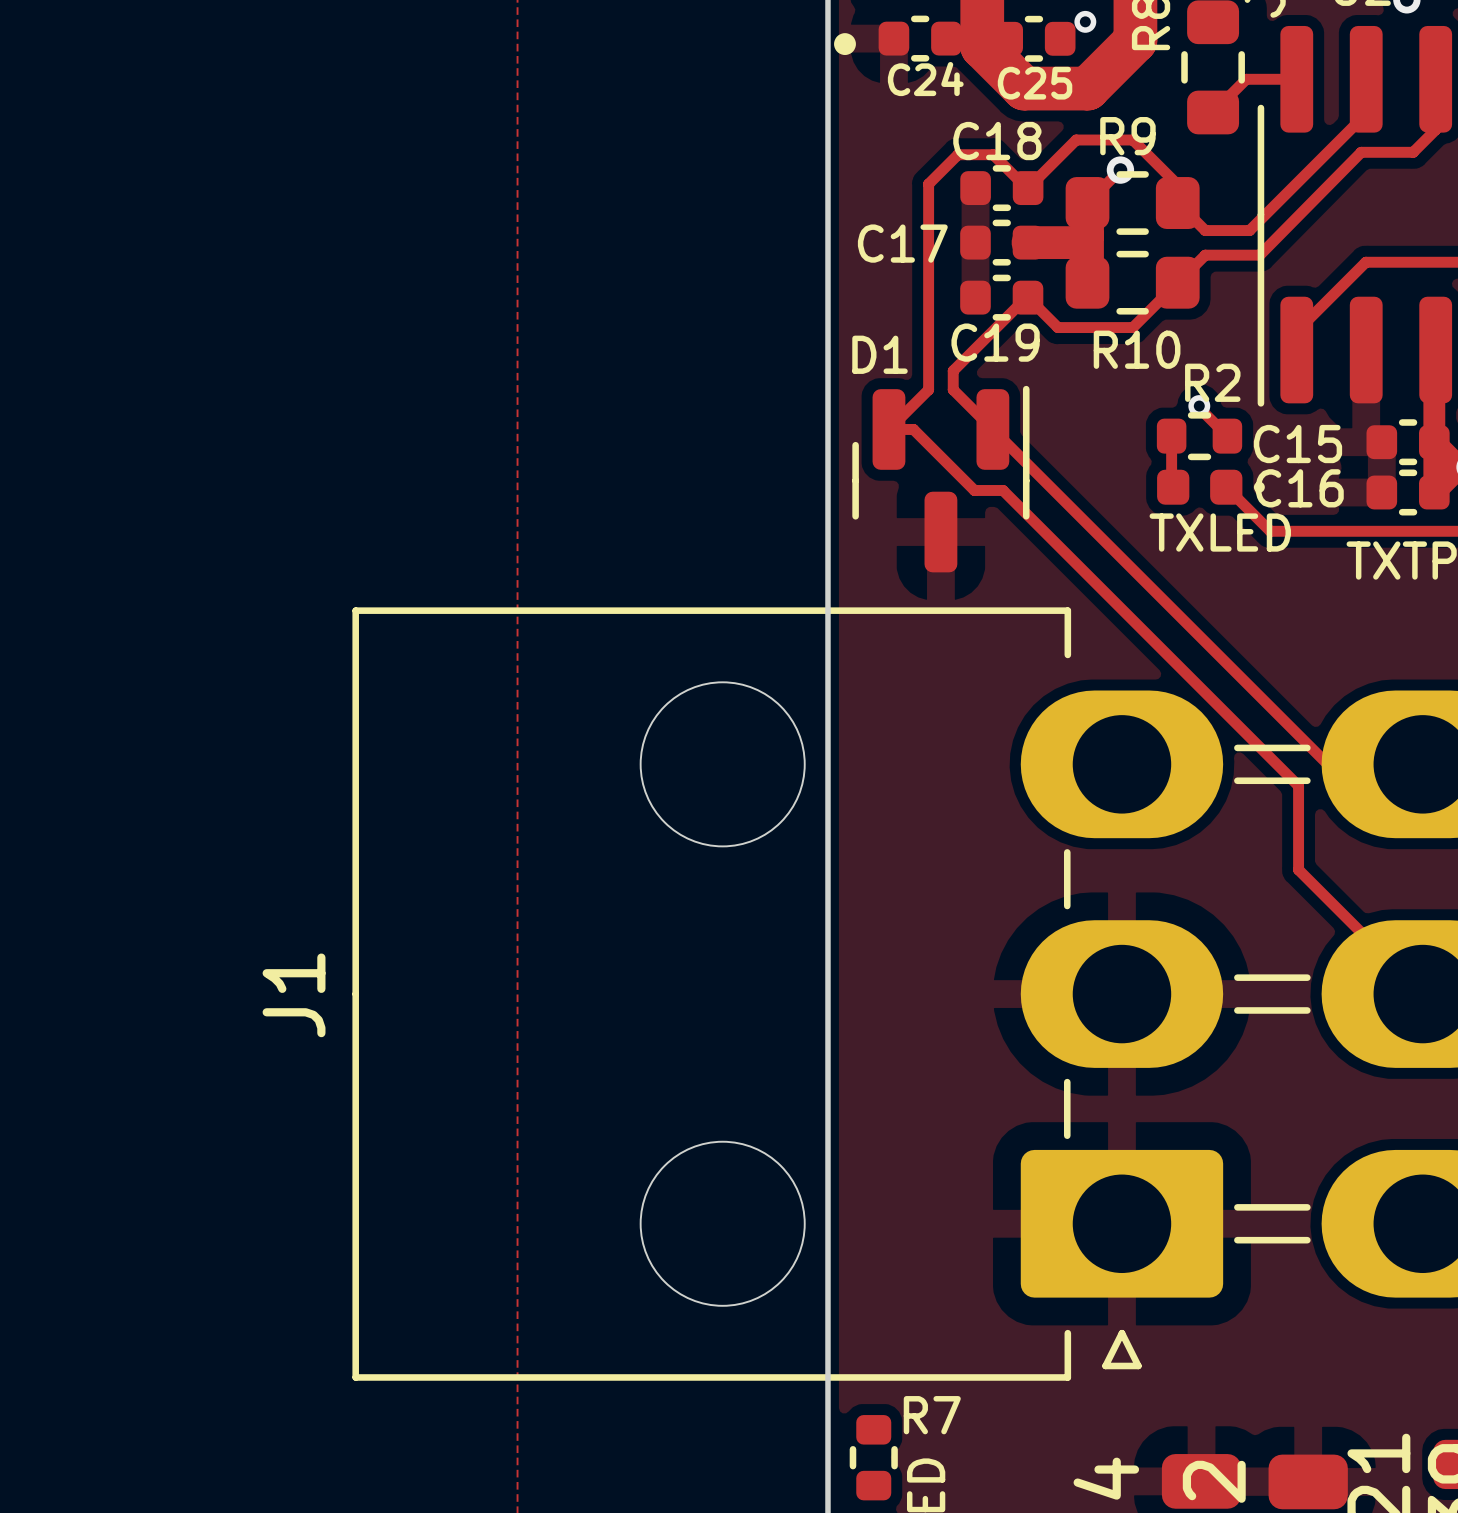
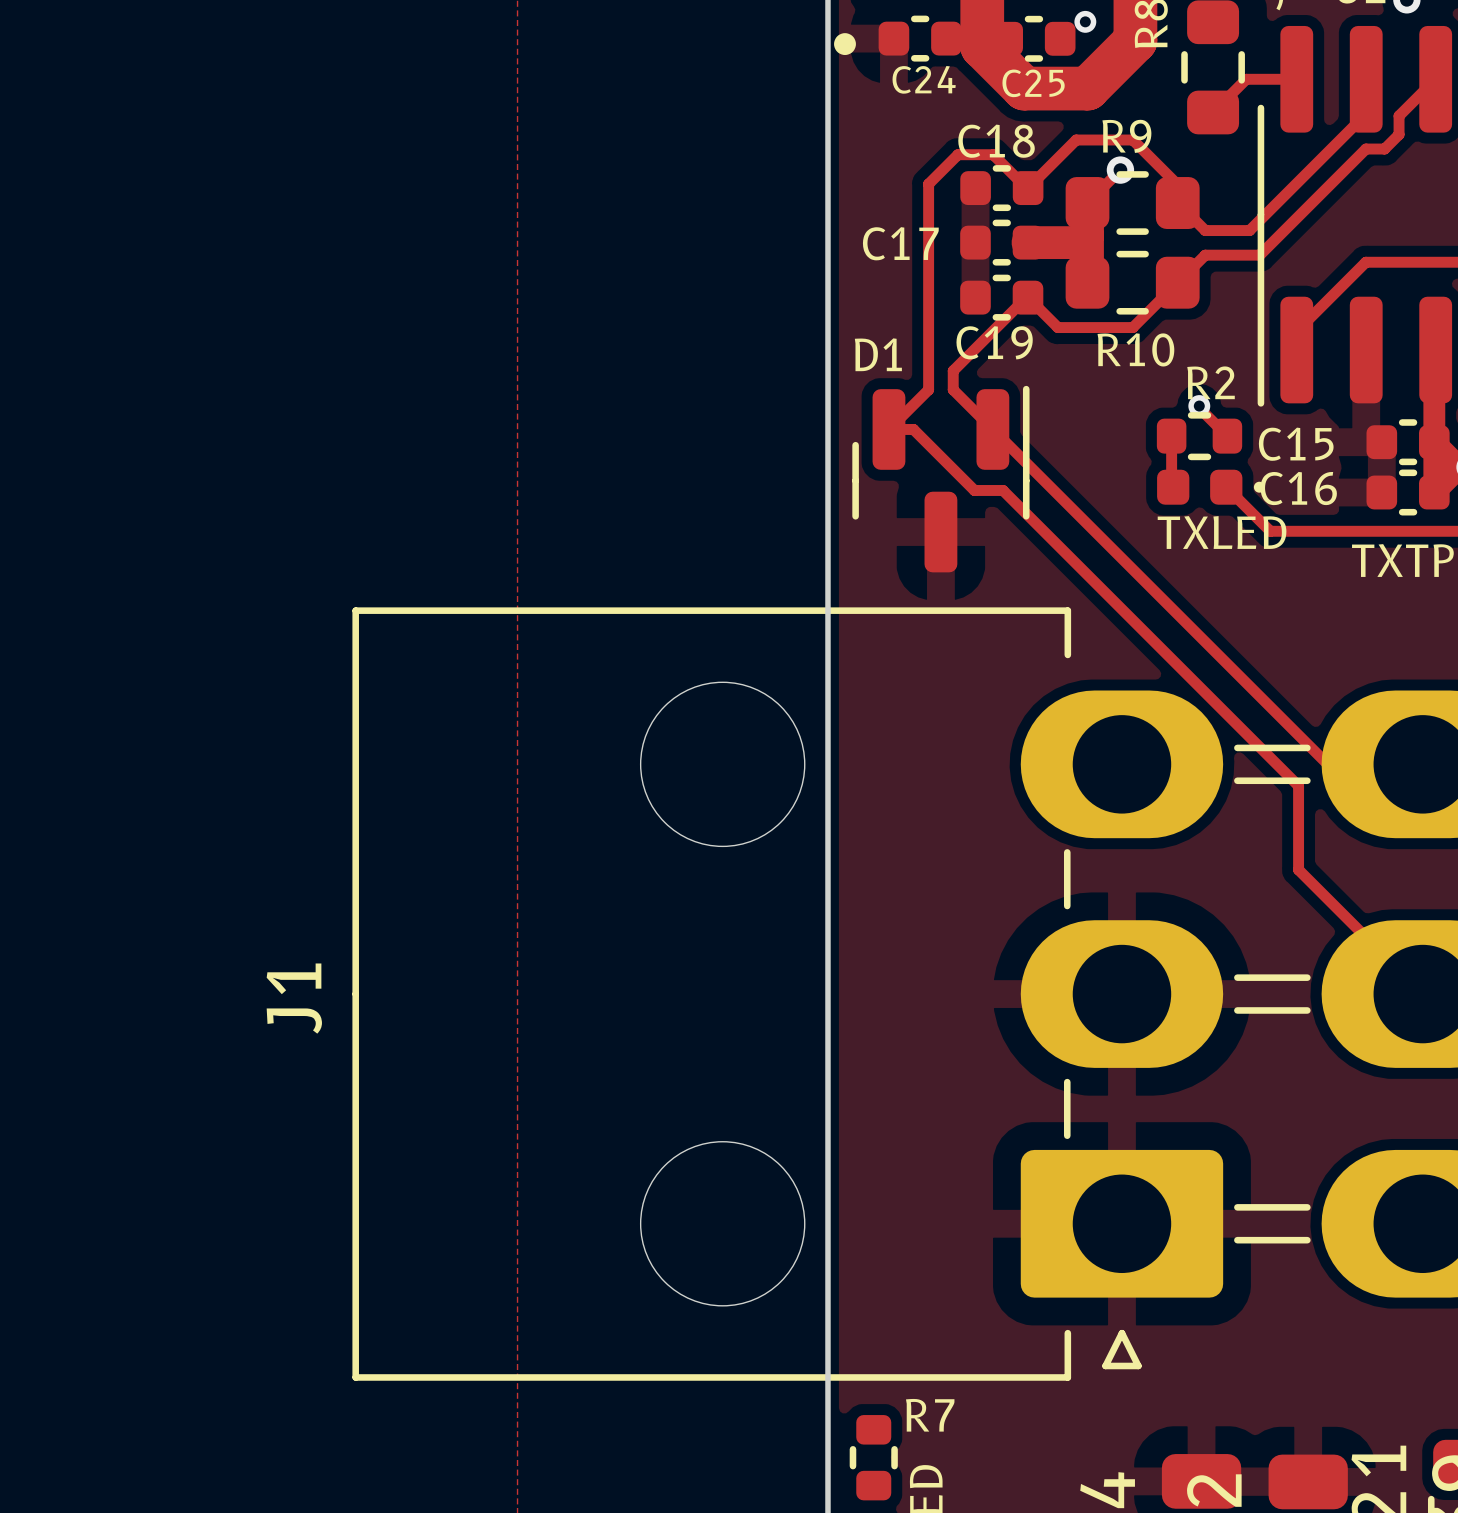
track: (1435, 79) (1435, 129) (1413, 152) (1361, 152) (1259, 255) -> (1435, 79) (1399, 115) (1399, 134) (1384, 149) (1365, 149) (1259, 255)

